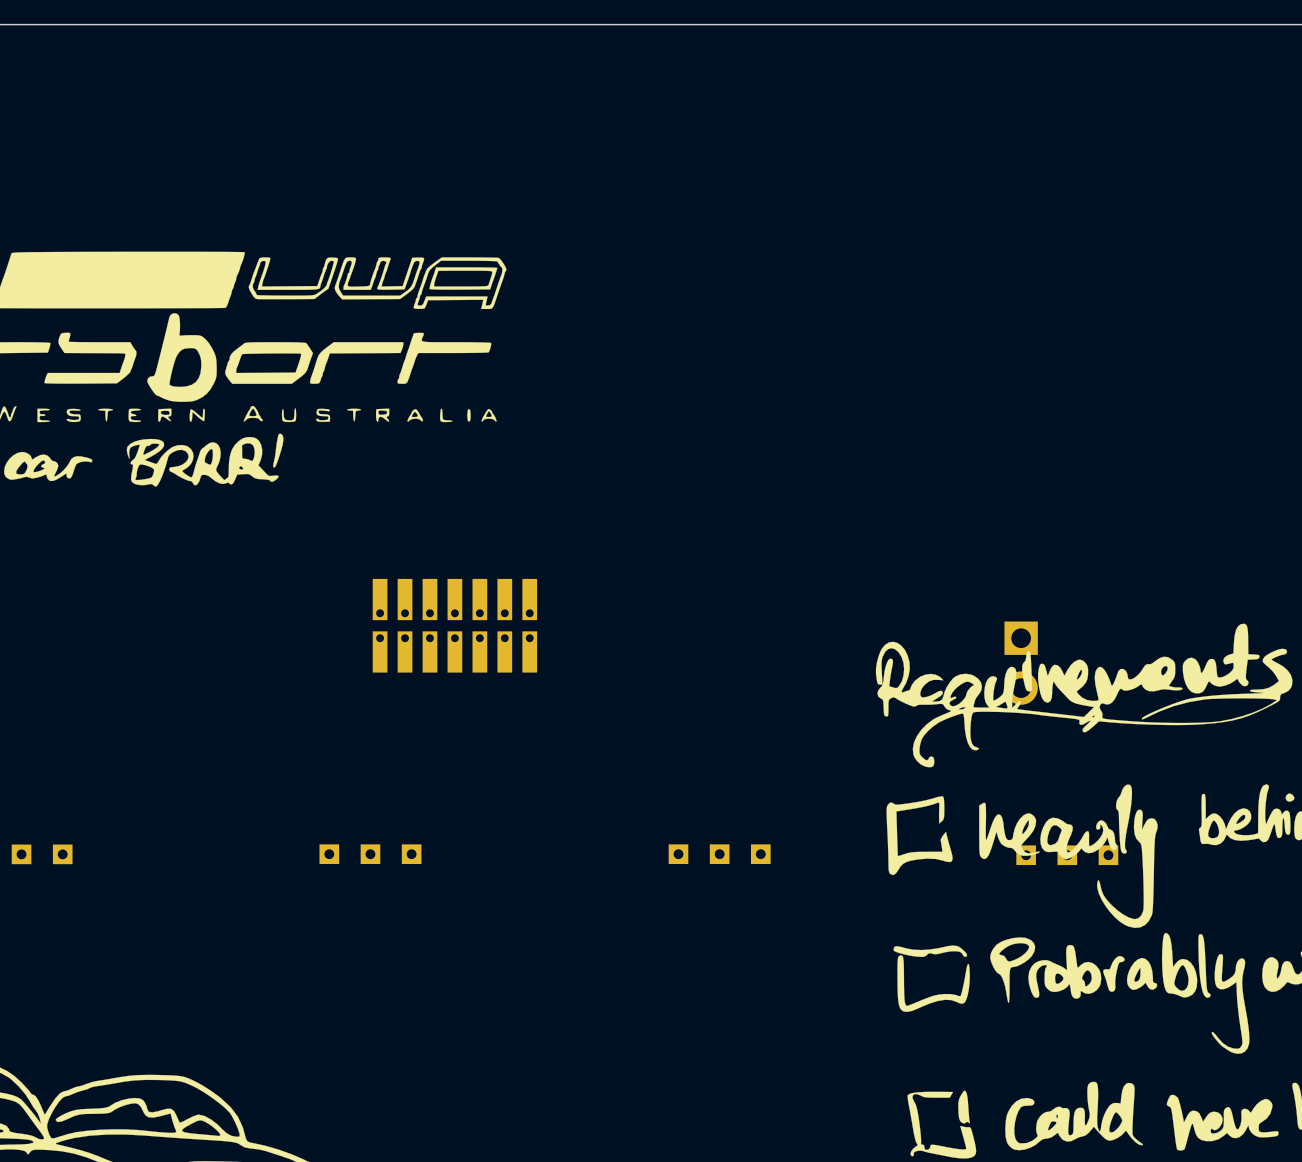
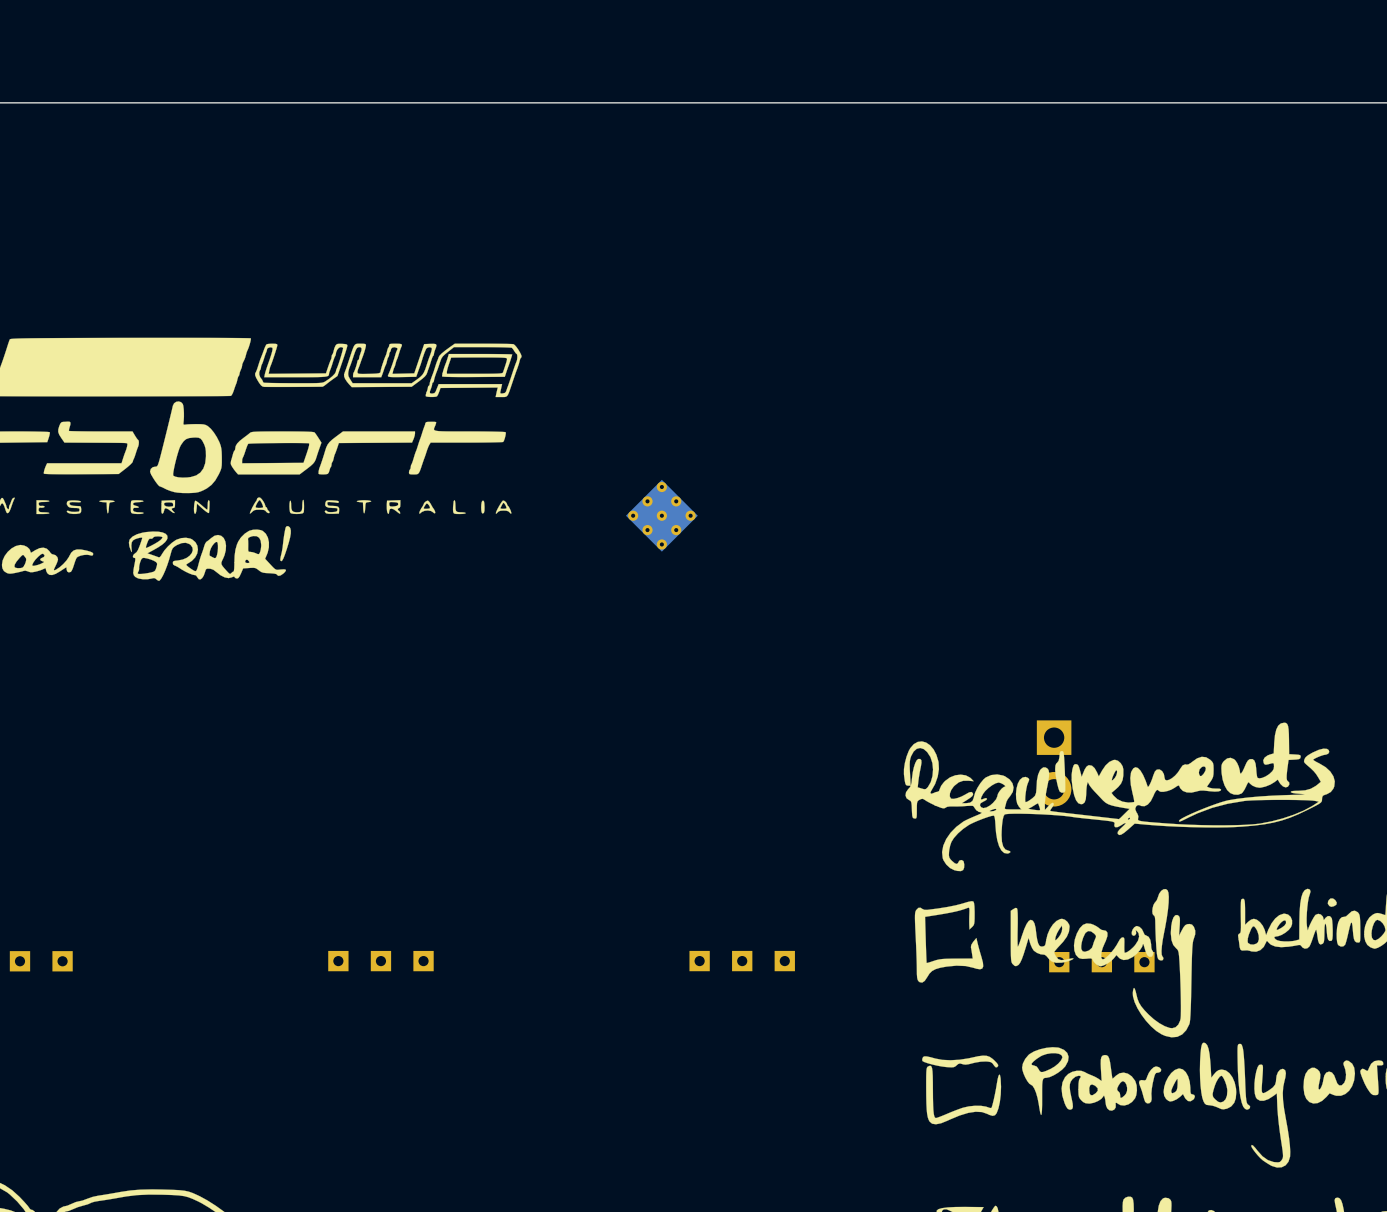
part: none -> (661, 515)
part: (454, 625) -> none

